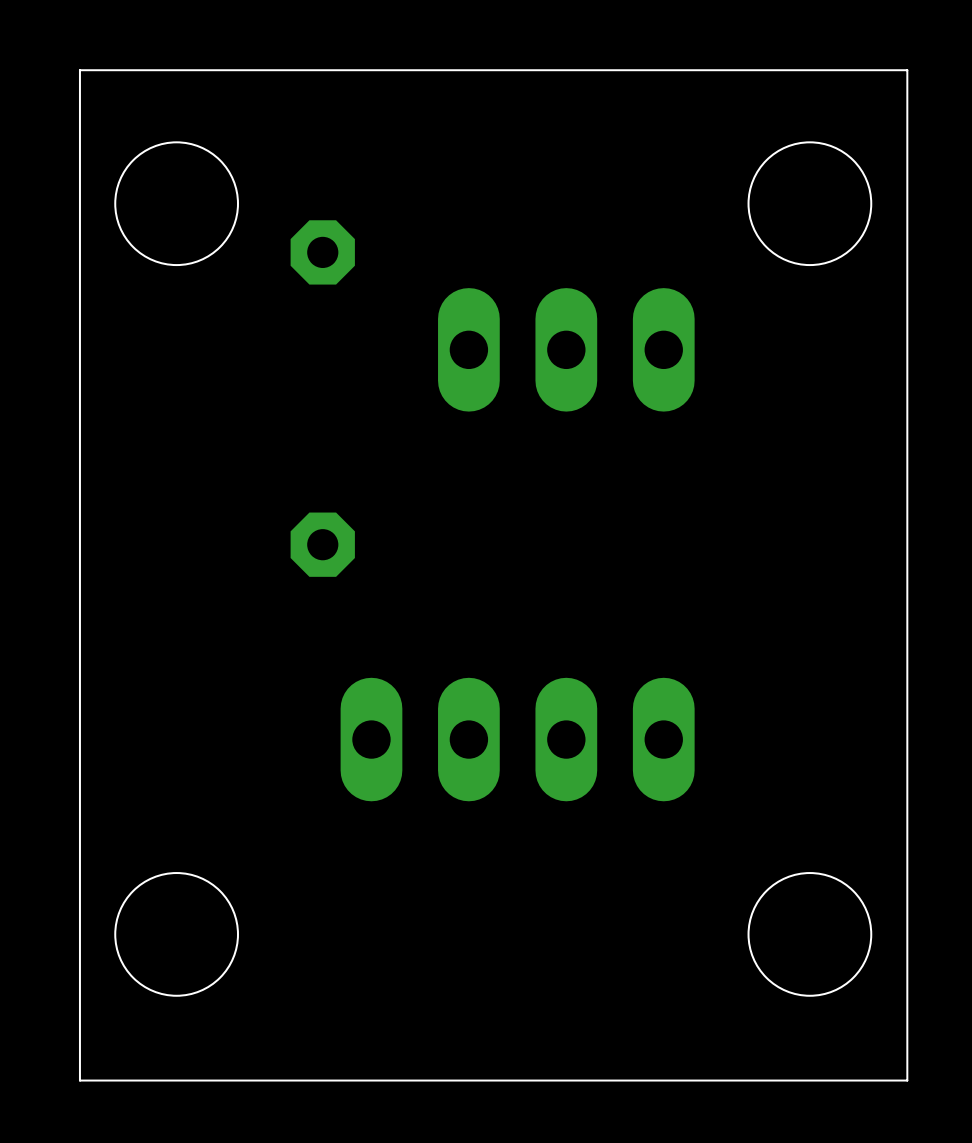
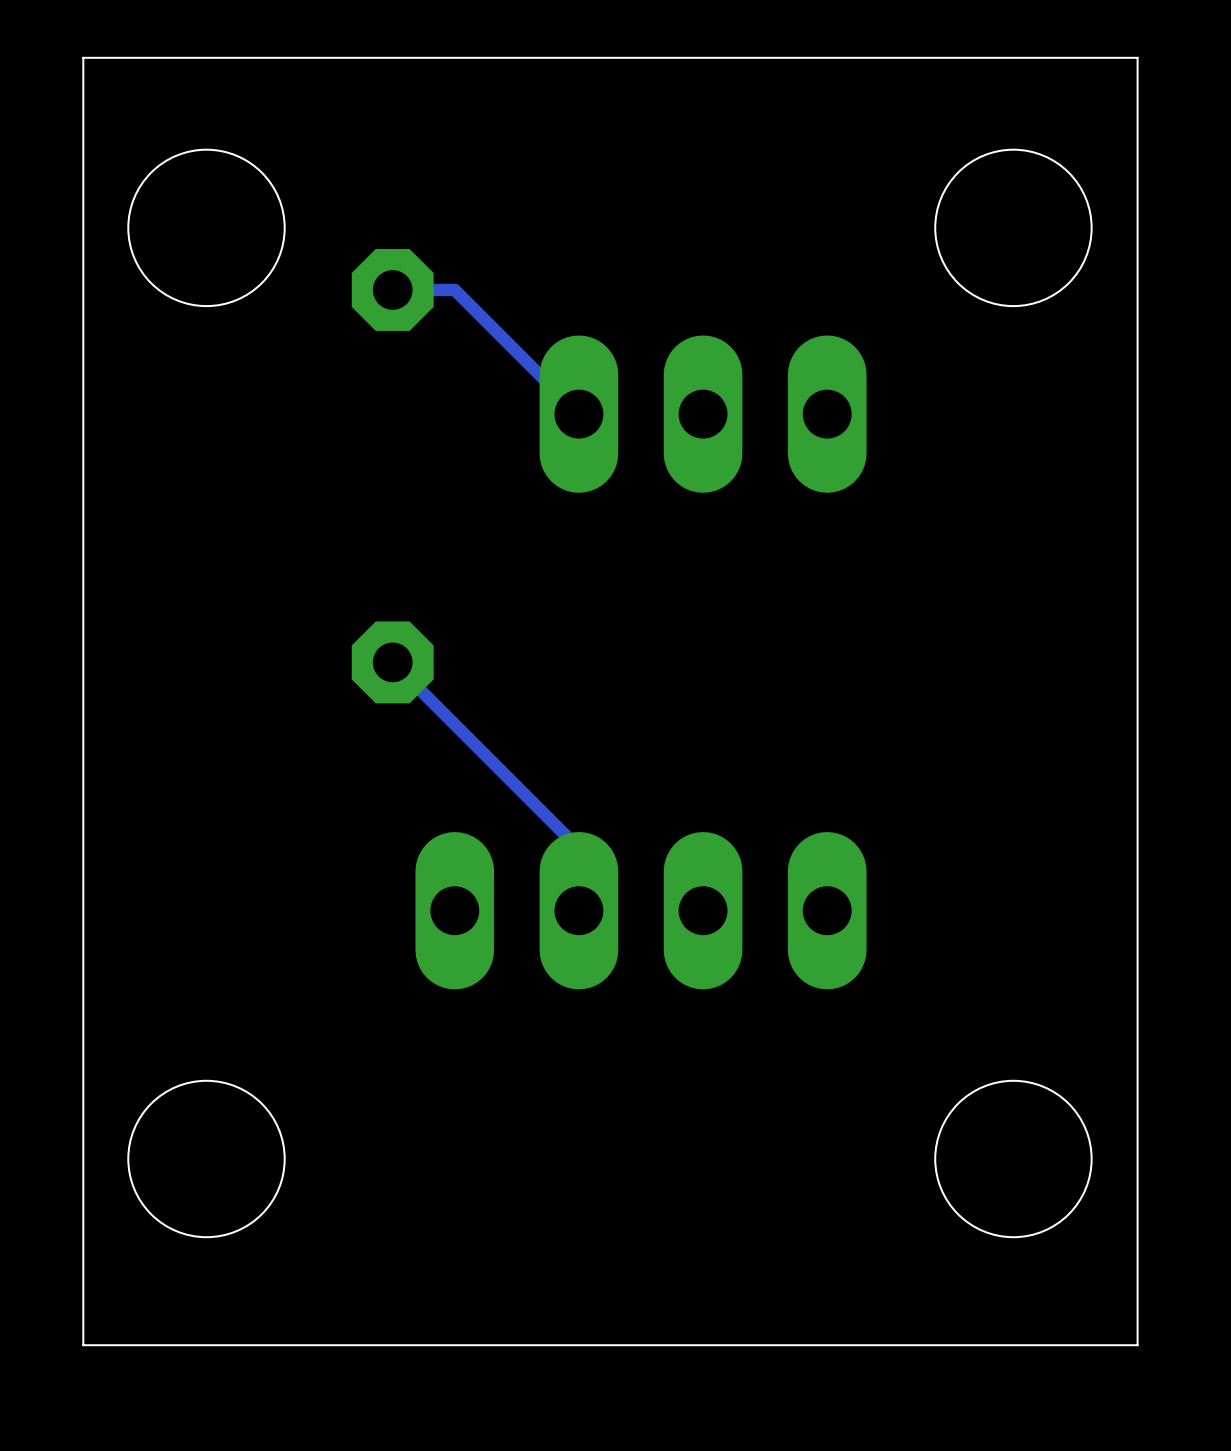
track: none -> (392, 289) (454, 289) (578, 414)
track: none -> (392, 662) (578, 848) (578, 910)

